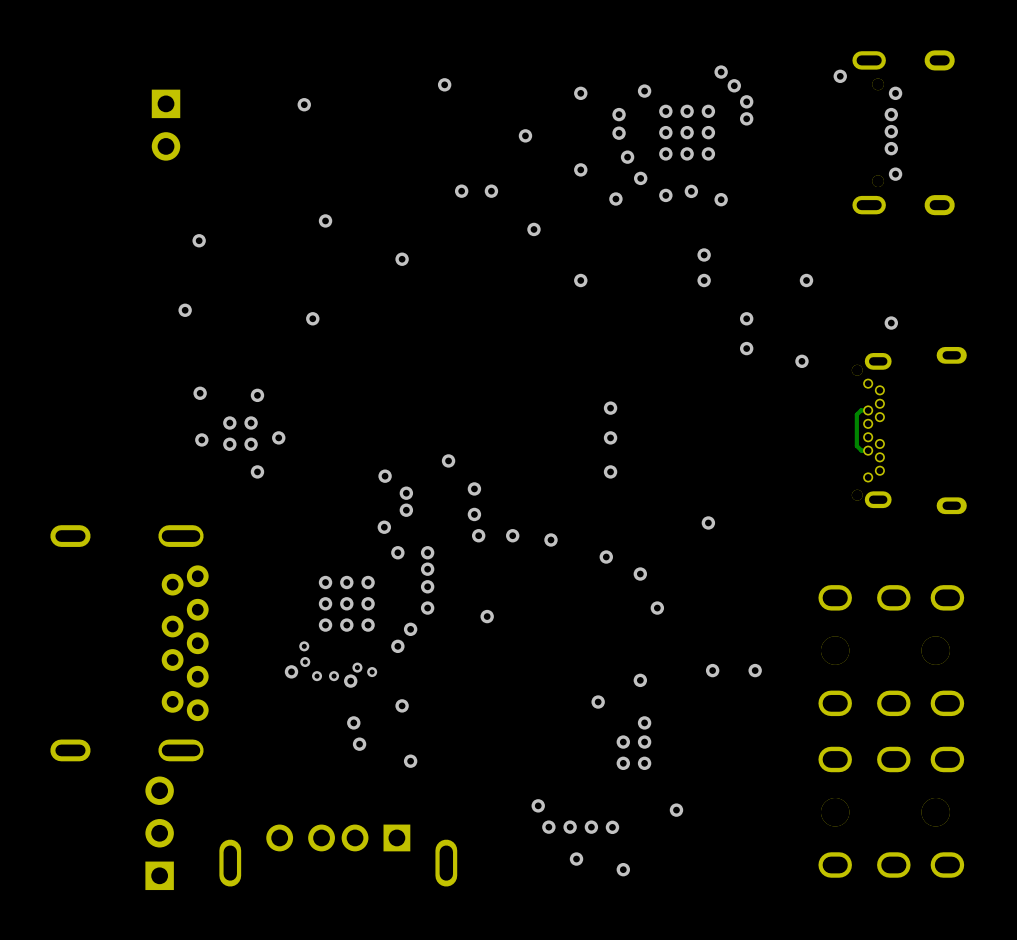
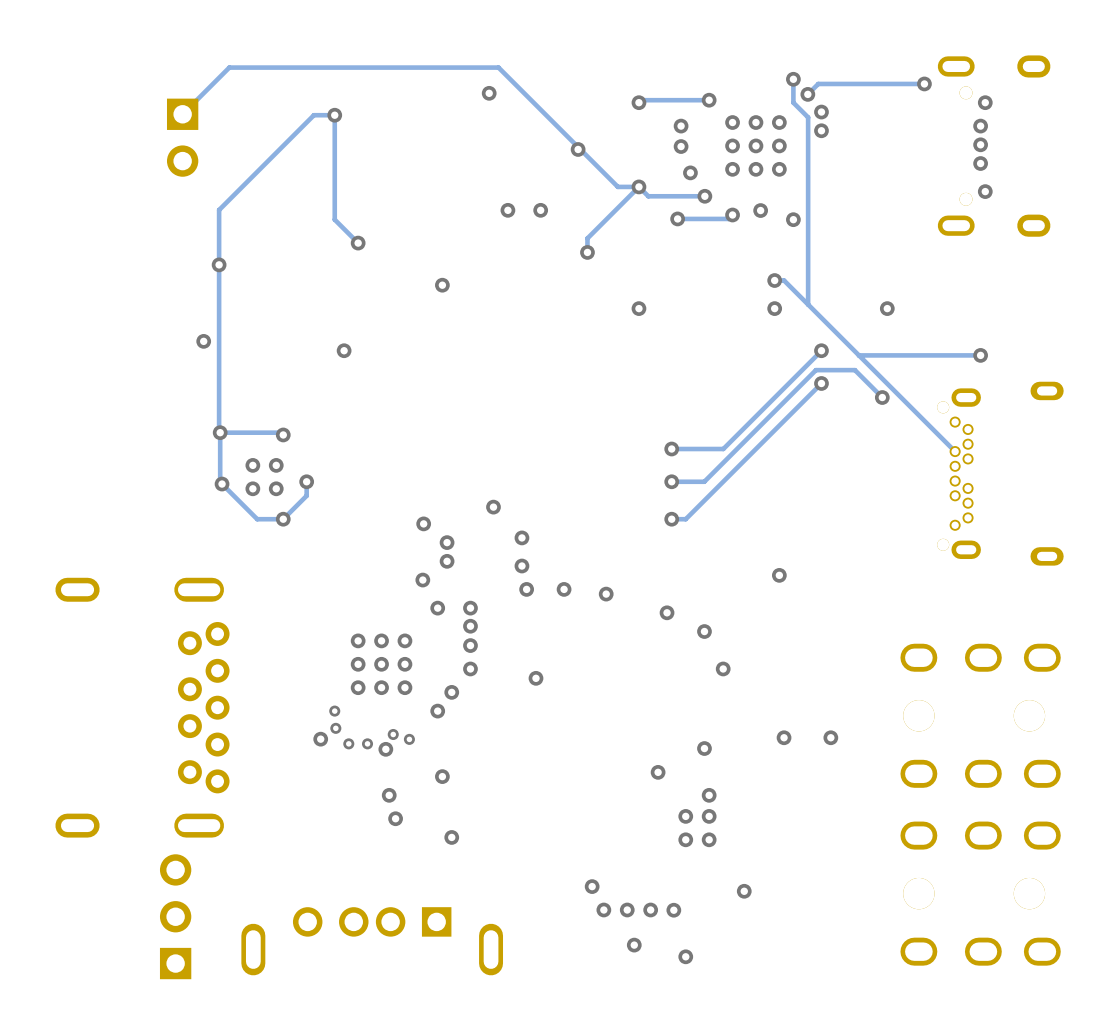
track: none -> (793, 79) (793, 102) (808, 117) (808, 304)
track: none -> (924, 83) (818, 83) (807, 94)
track: none -> (709, 100) (641, 100) (638, 102)
track: none -> (182, 114) (229, 67) (498, 67) (578, 147) (578, 149) (580, 149) (617, 186) (638, 186)
track: none -> (638, 186) (587, 238) (587, 252)
track: none -> (638, 186) (648, 196) (704, 196)
track: none -> (732, 215) (728, 218) (677, 218)
track: none -> (358, 243) (334, 219) (334, 115) (313, 115) (219, 210) (220, 432)
track: none -> (821, 350) (723, 449) (671, 449)
track: none -> (980, 355) (858, 355)
track: none -> (821, 383) (685, 519) (671, 519)
track: none -> (882, 397) (854, 370) (815, 370) (704, 481) (671, 481)
track: none -> (220, 432) (220, 482)
track: none -> (220, 432) (280, 432) (283, 434)
track: (868, 410) (861, 410) (856, 414) (856, 445) (861, 450) (868, 450) -> (955, 451) (784, 280) (774, 280)
track: none -> (219, 481) (257, 519) (283, 519) (306, 495) (306, 481)

